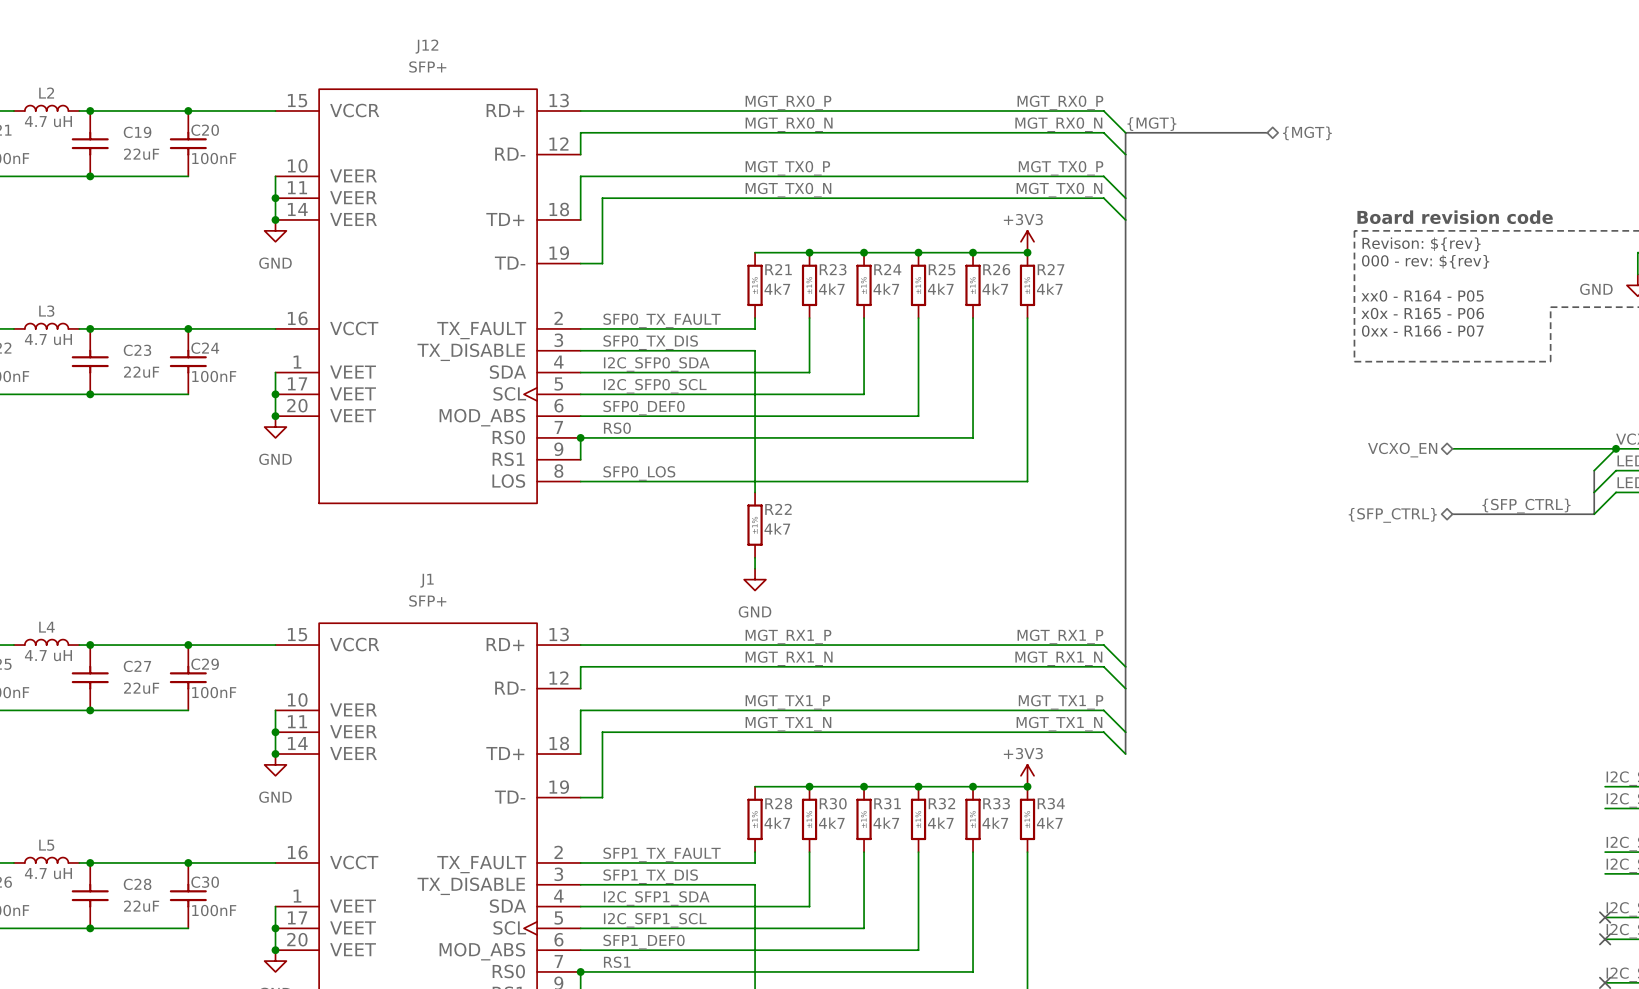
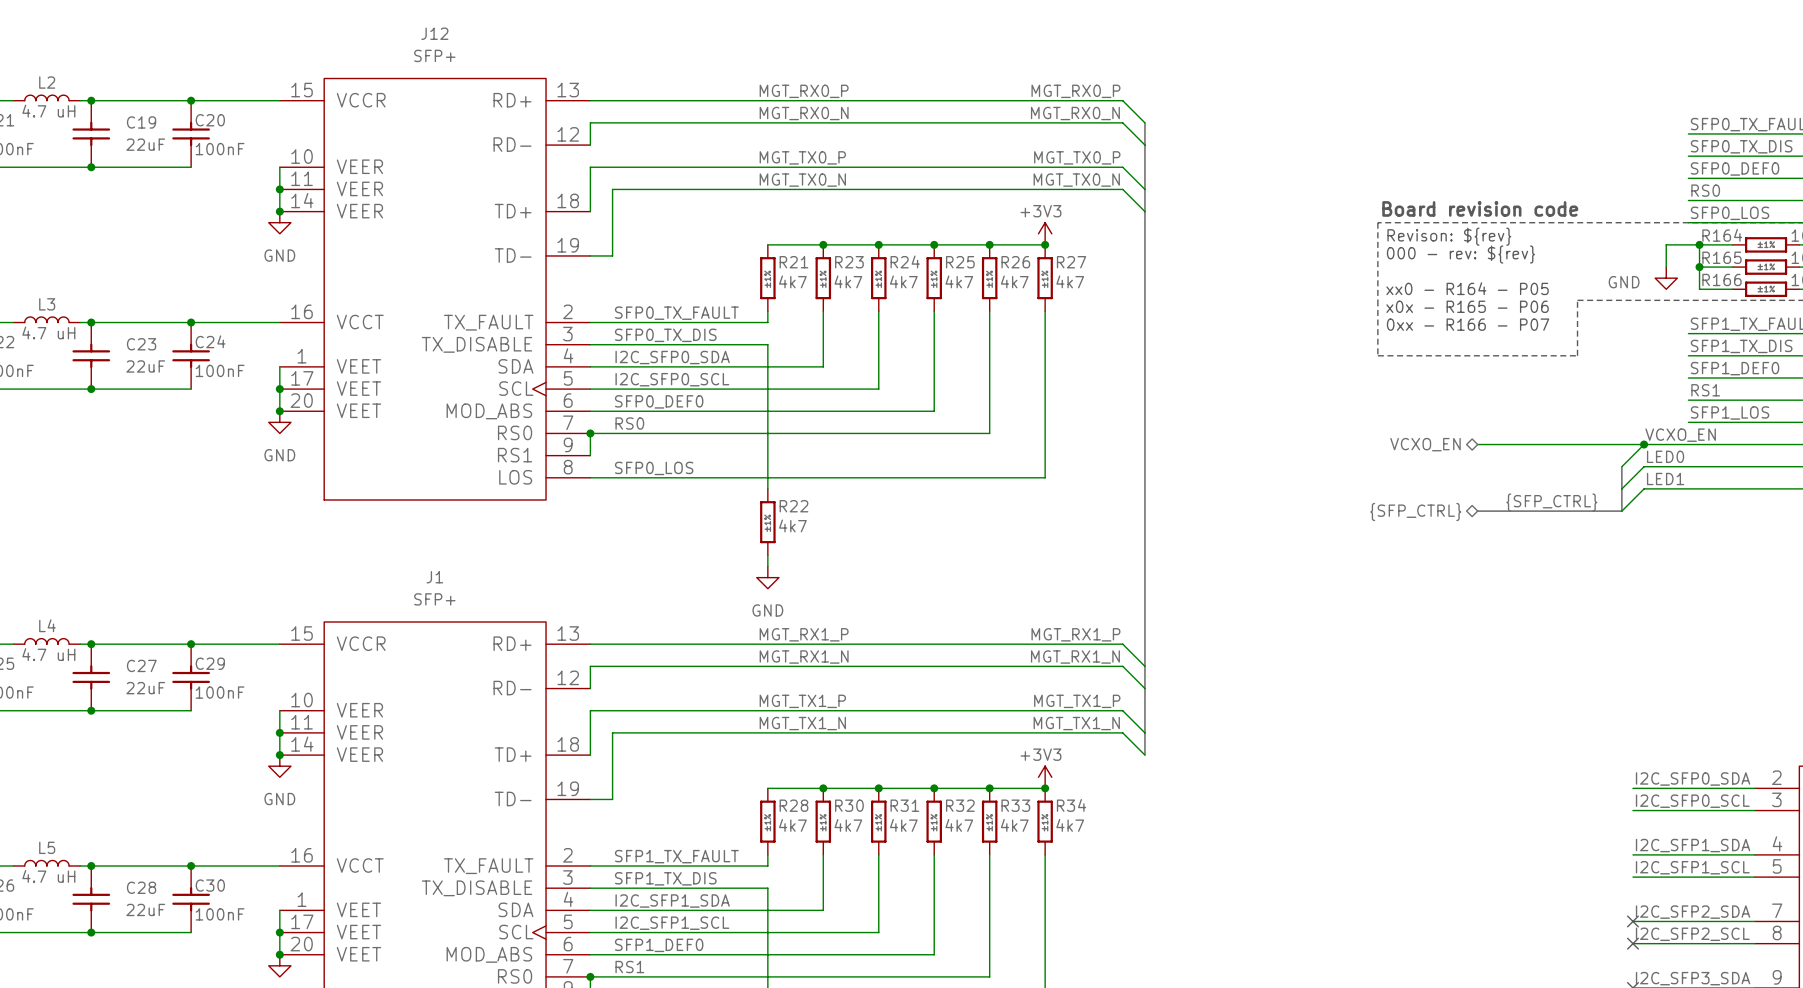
label: {MGT} (1151, 124) -> none
bus: (1125, 132) (1267, 132) -> none
hierarchical label: {MGT} (1307, 133) -> none

